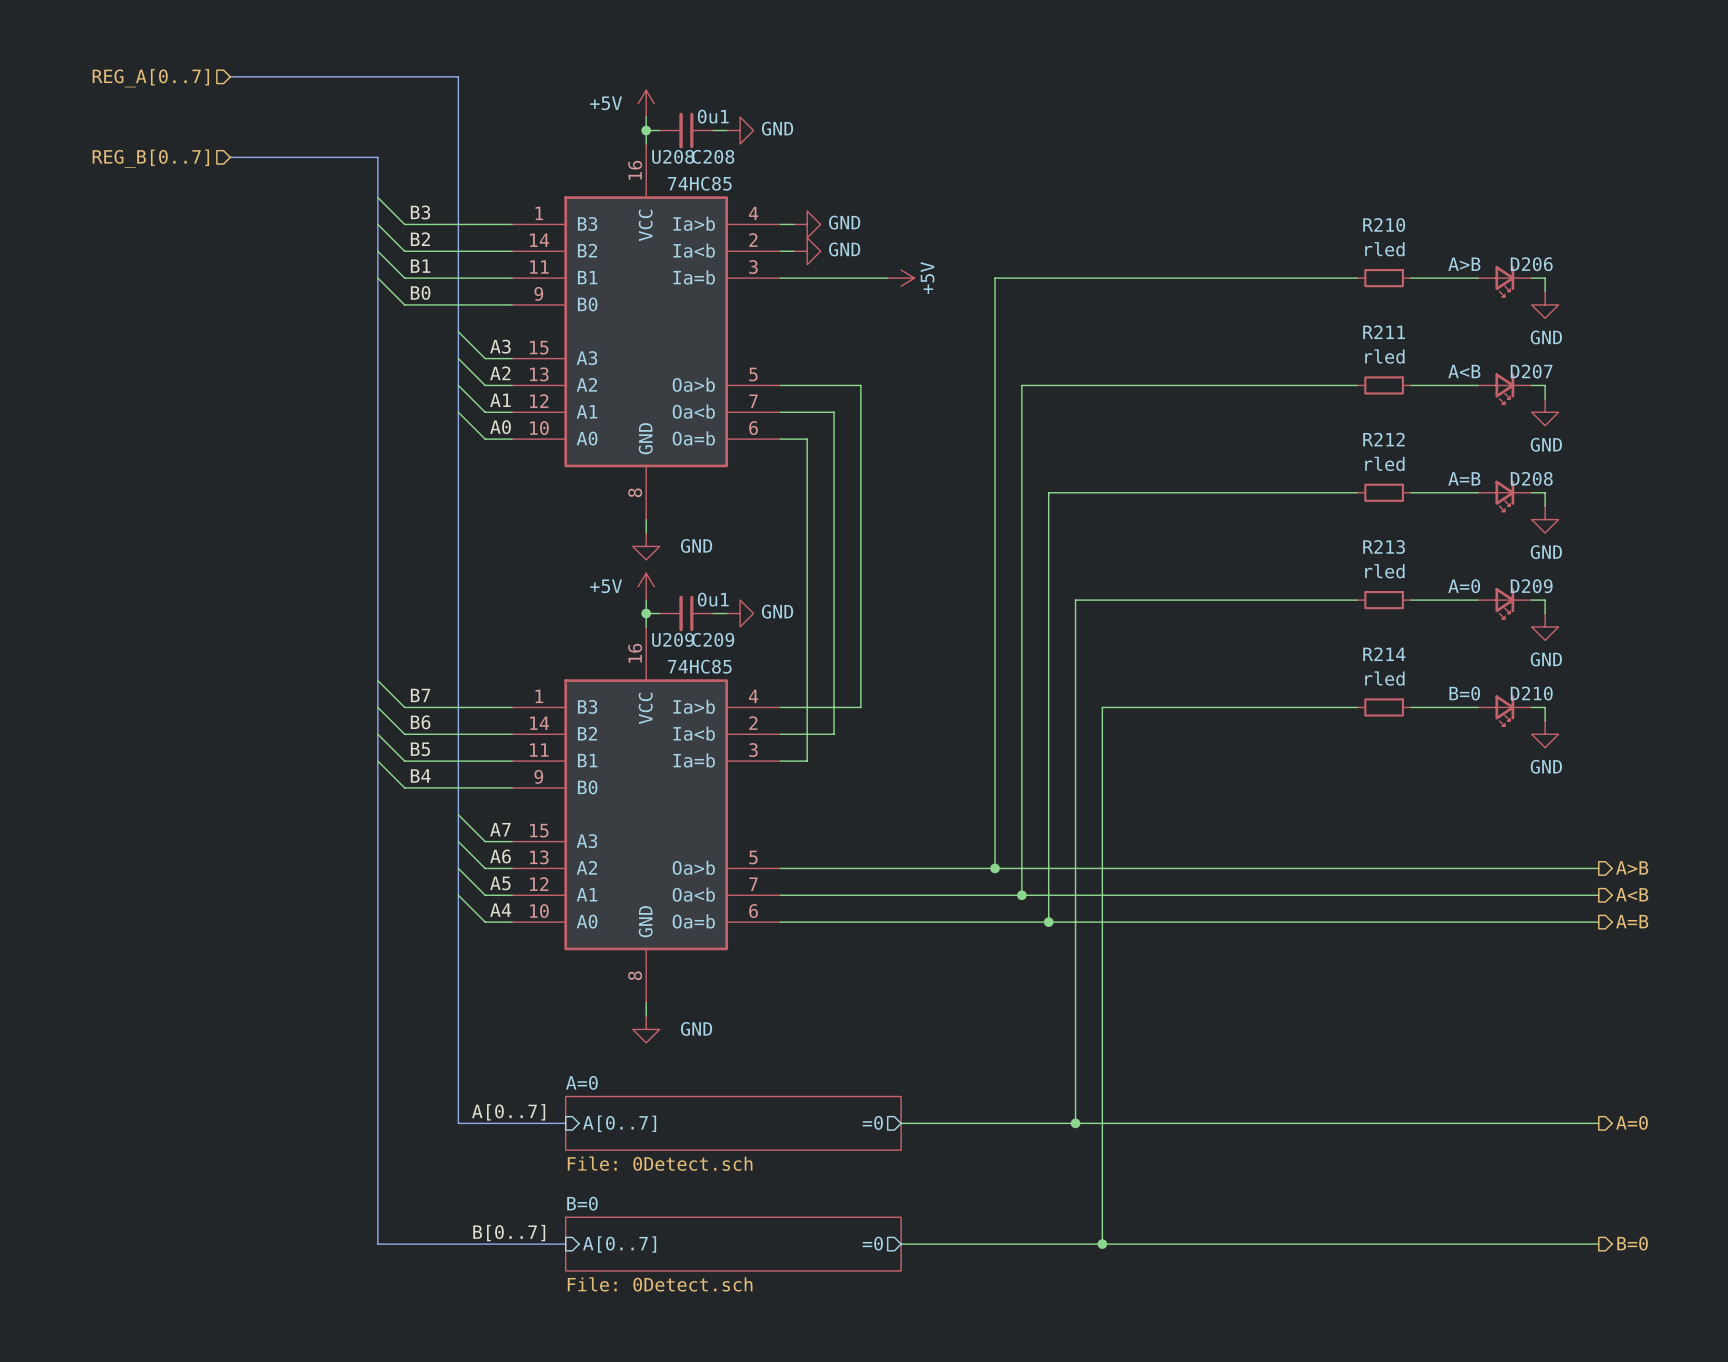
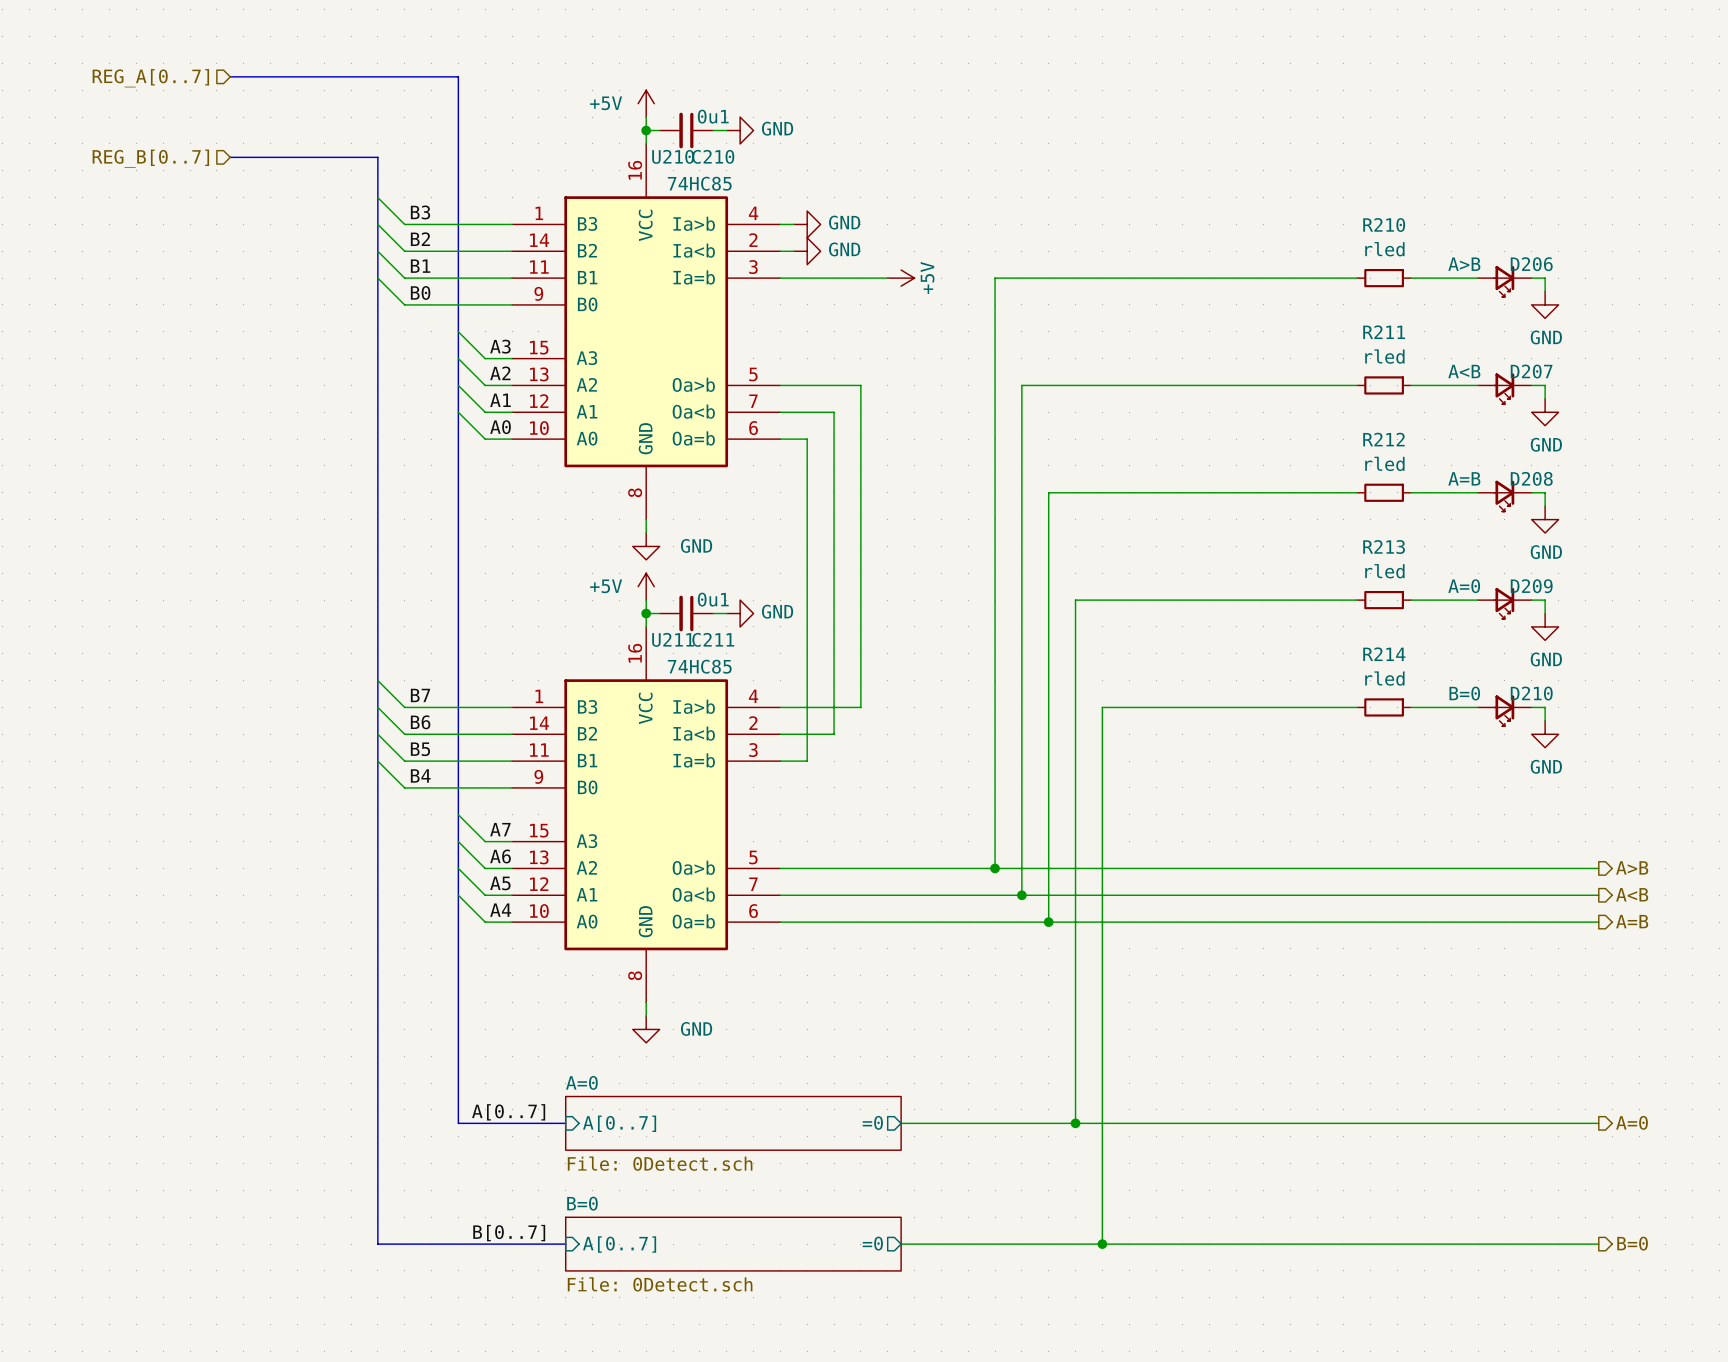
U208 name: U208 (673, 156) -> U210 (673, 156)
C208 name: C208 (713, 156) -> C210 (713, 156)
U209 name: U209 (673, 639) -> U211 (673, 639)
C209 name: C209 (713, 639) -> C211 (713, 639)

